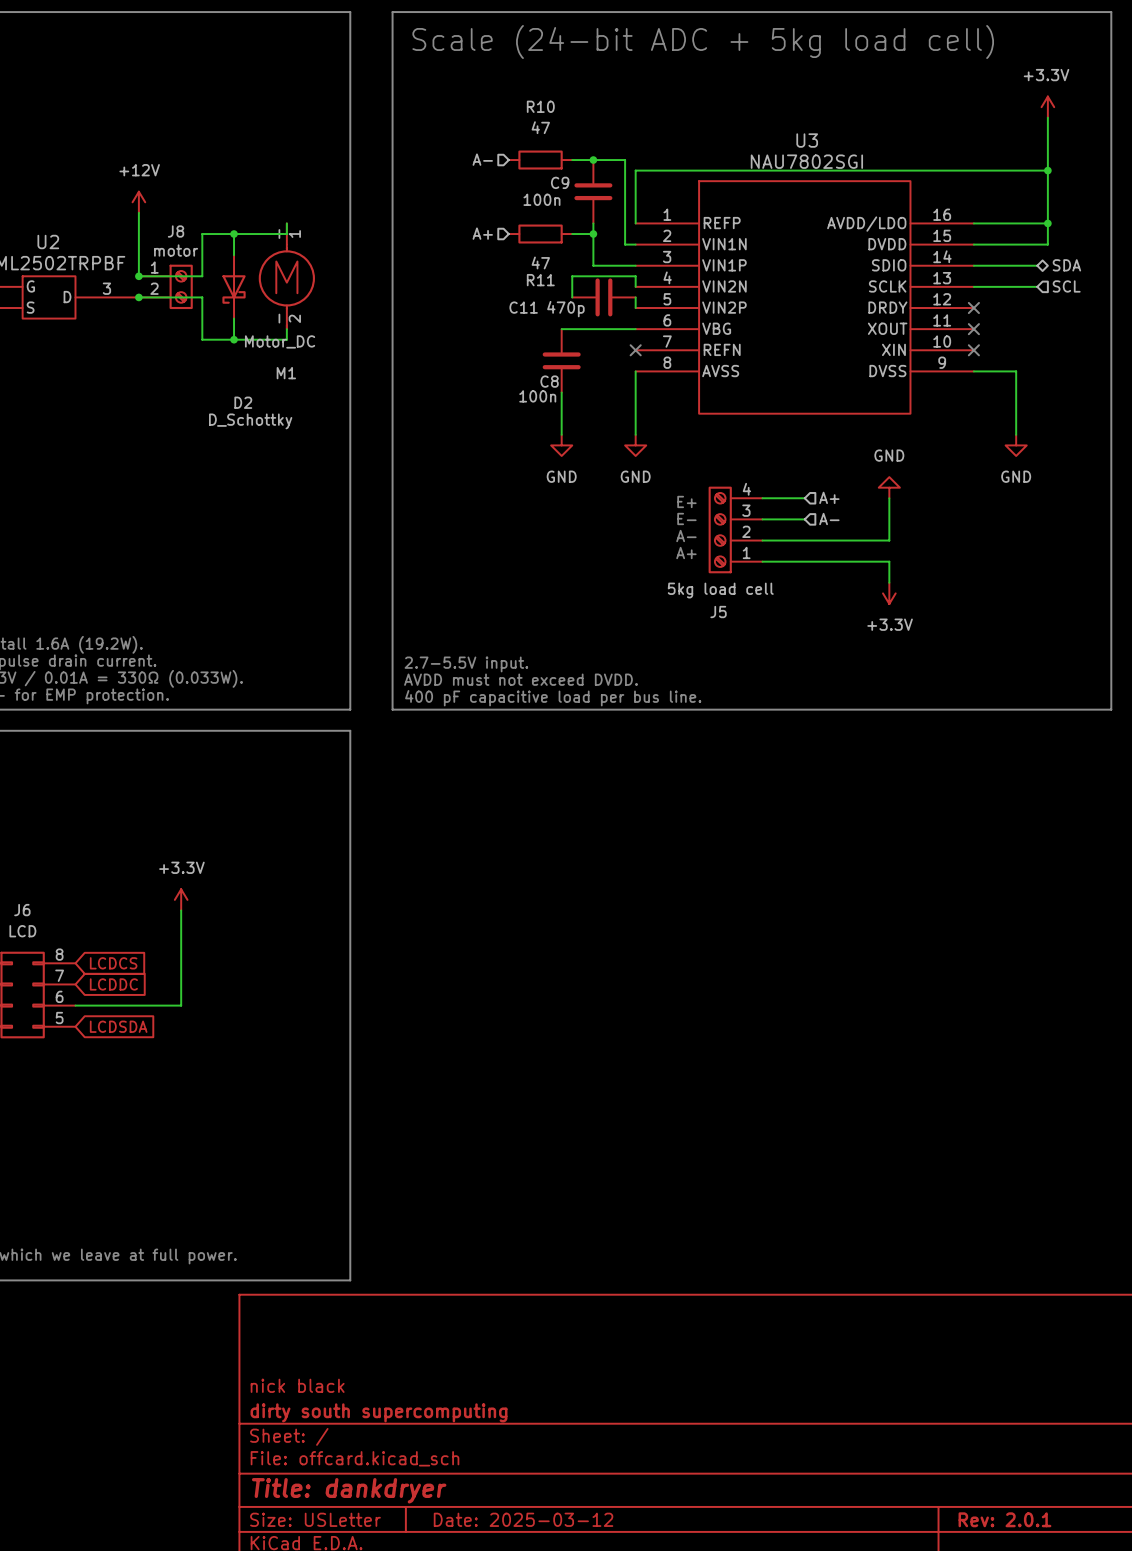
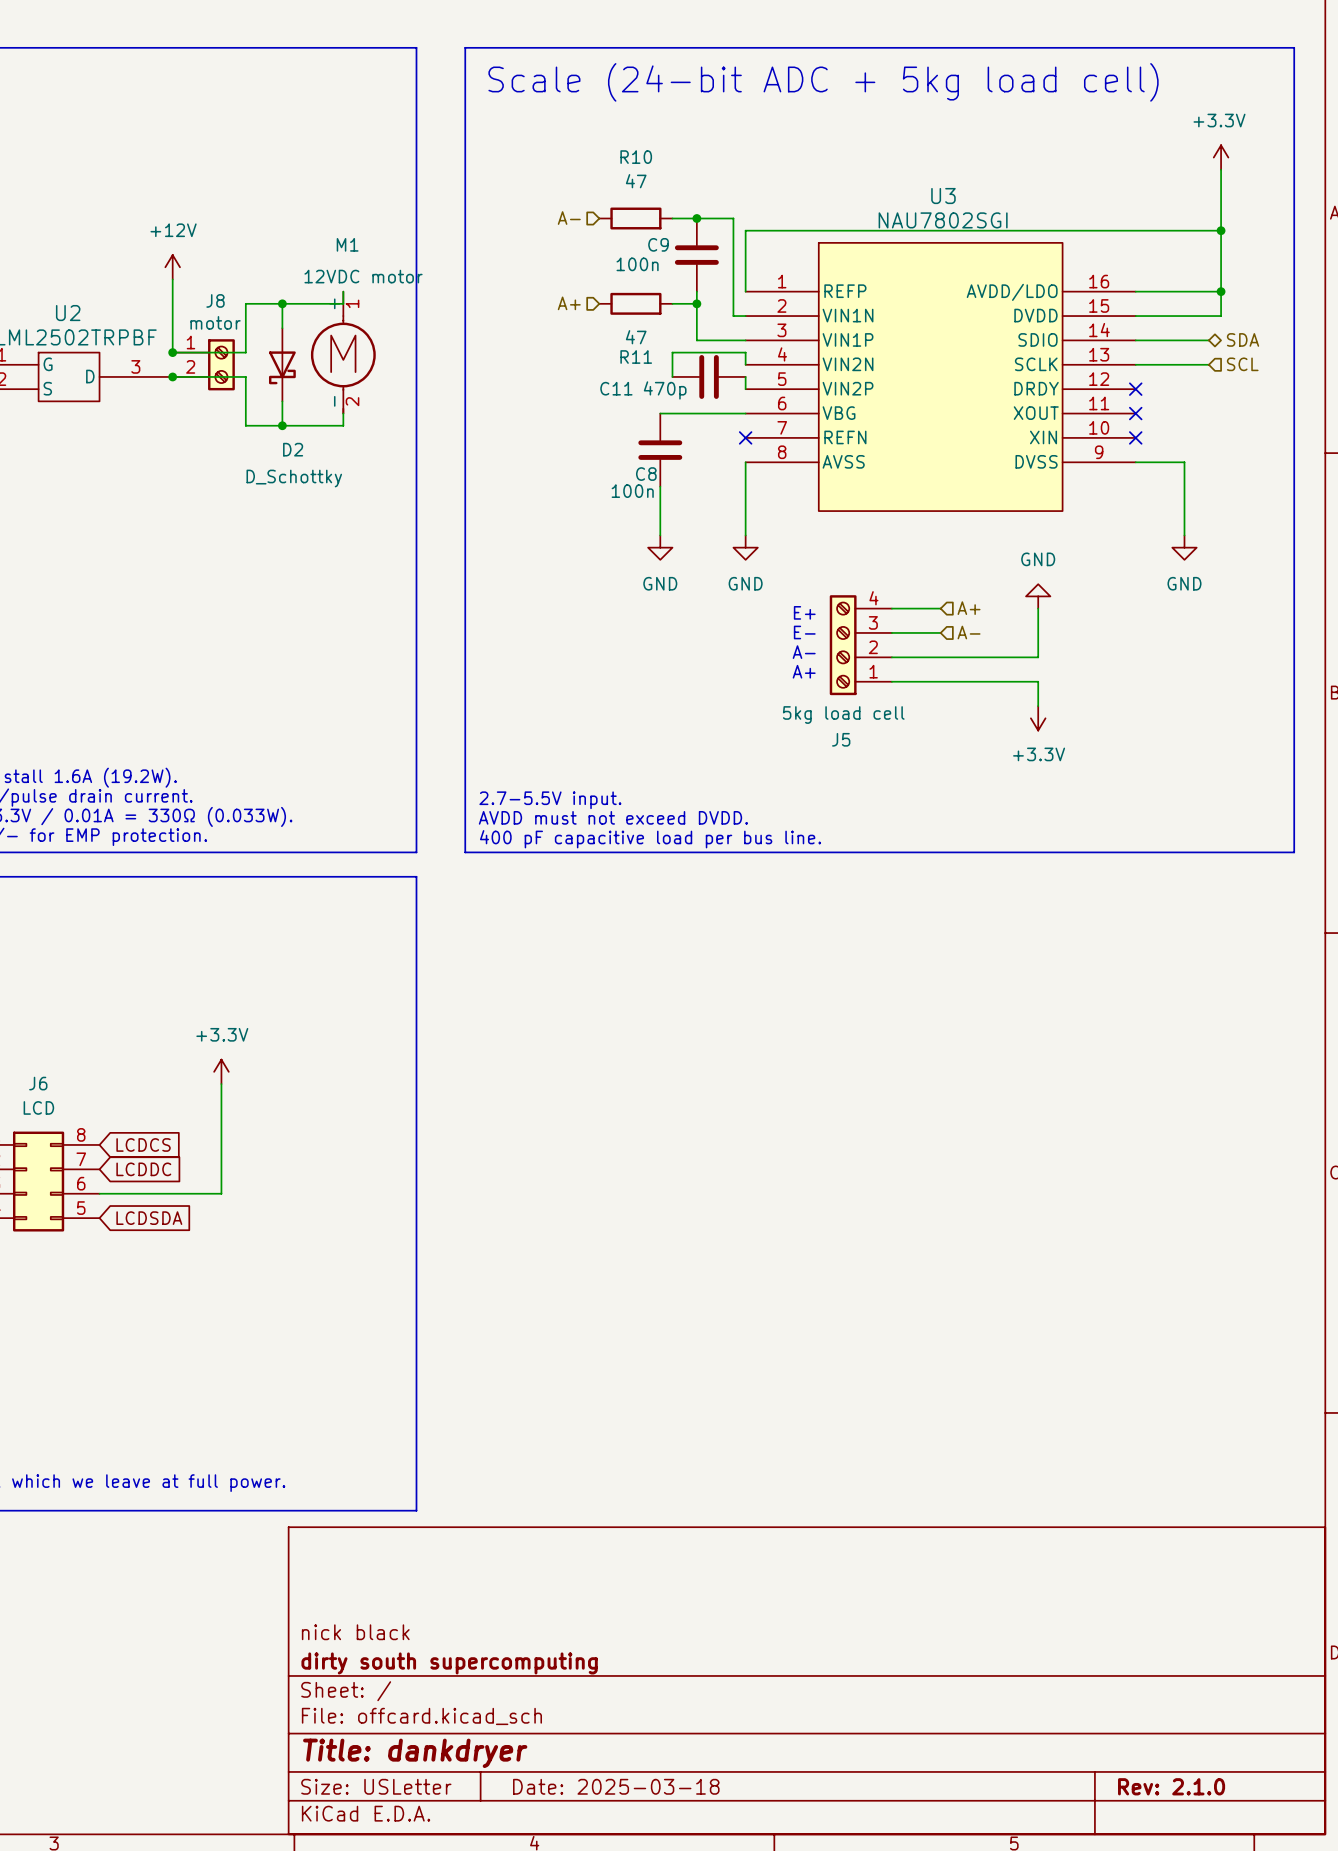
M1 value: Motor_DC (280, 341) -> 12VDC motor (363, 276)
M1 name position: M1 (286, 373) -> M1 (347, 244)
D2 name position: D2 (243, 402) -> D2 (293, 449)
D2 value position: D_Schottky (250, 421) -> D_Schottky (294, 478)
title block: Date: 2025-03-12 (523, 1519) -> Date: 2025-03-18 (616, 1786)
title block: Rev: 2.0.1 (1004, 1519) -> Rev: 2.1.0 (1171, 1786)

